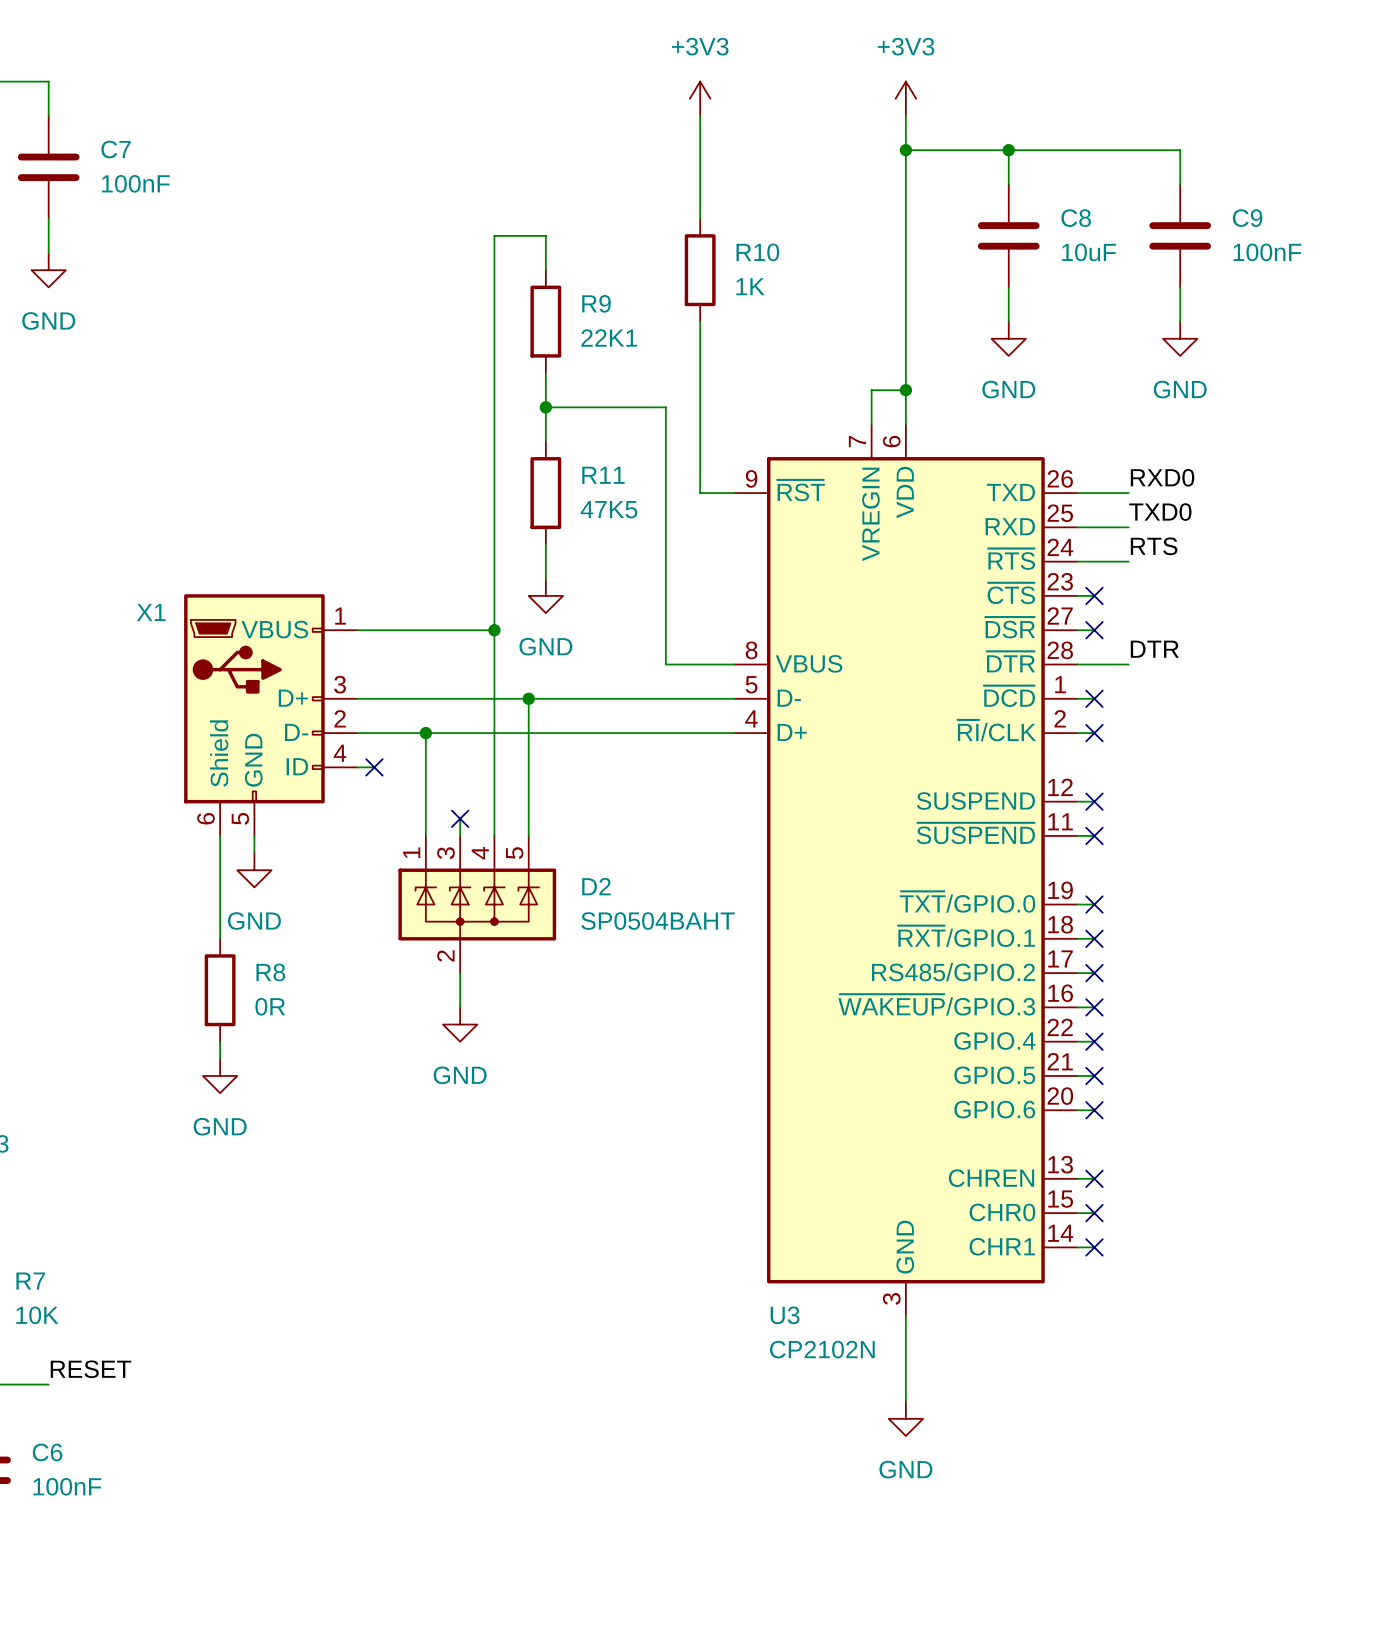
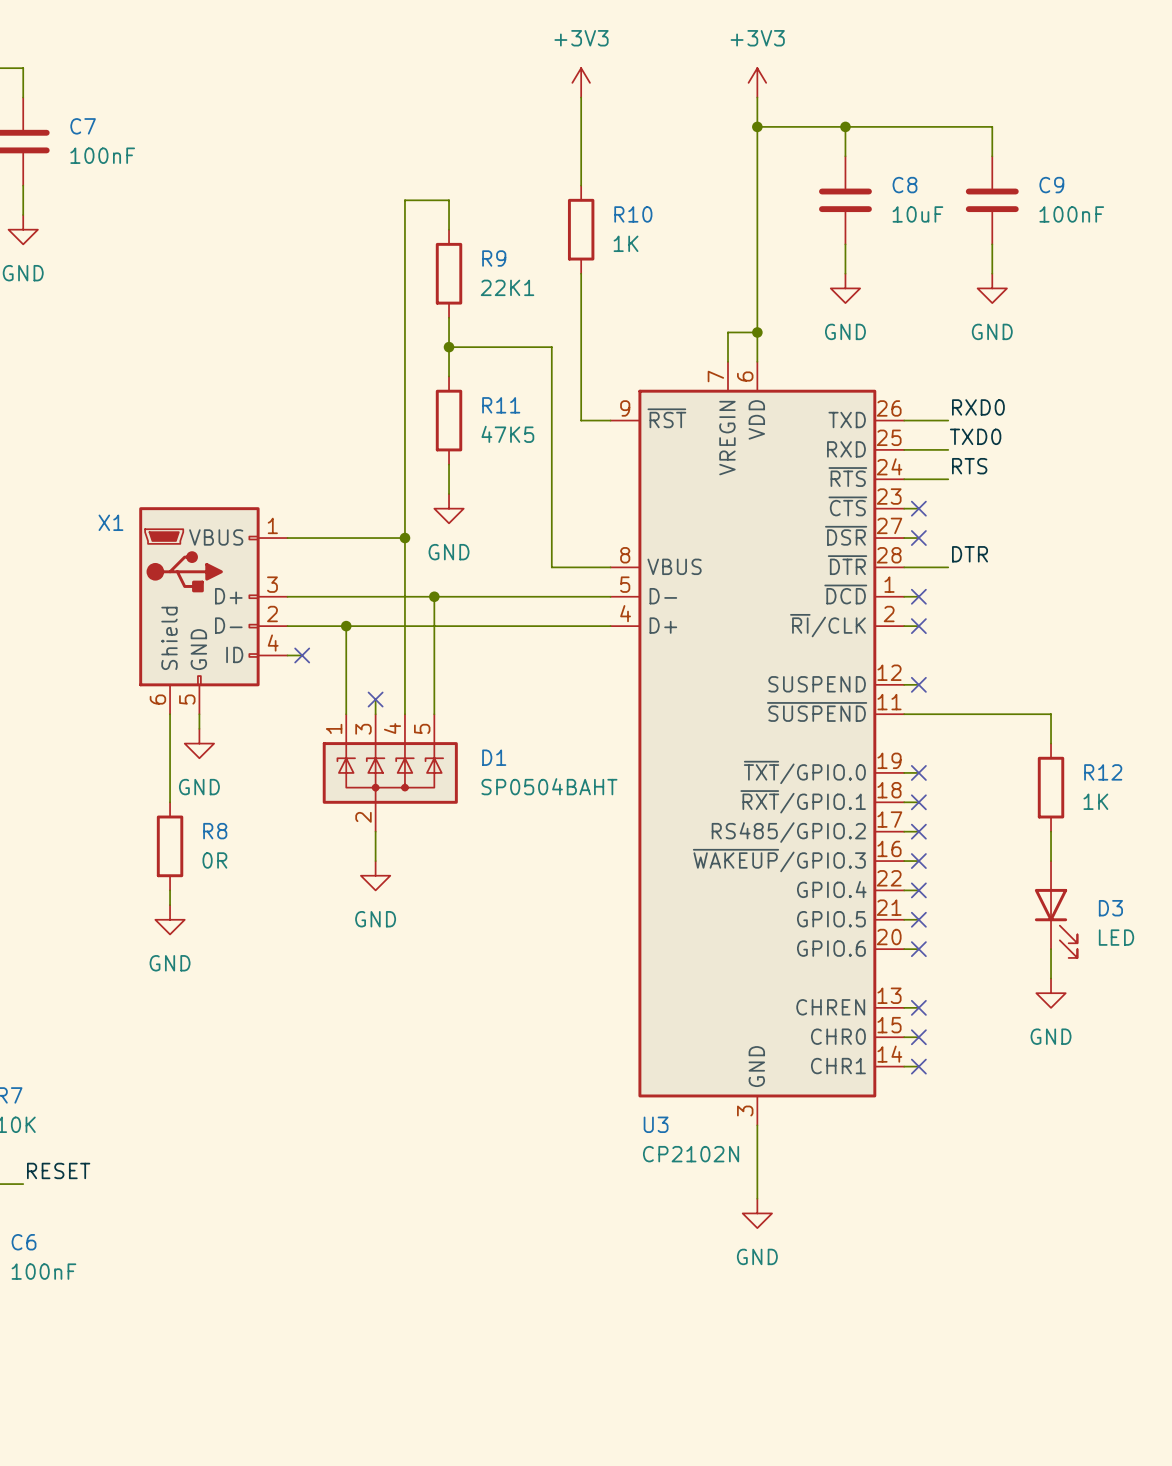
wire: none -> (918, 714) (1051, 714) (1051, 743)
no-connect mark: (1094, 835) -> none
D2 name: D2 (596, 886) -> D1 (494, 757)
R12: none -> 1K (1051, 787)
wire: none -> (1051, 831) (1051, 861)
D3: none -> LED (1056, 909)
wire: none -> (1051, 949) (1051, 978)
power symbol: none -> GND (1051, 993)

